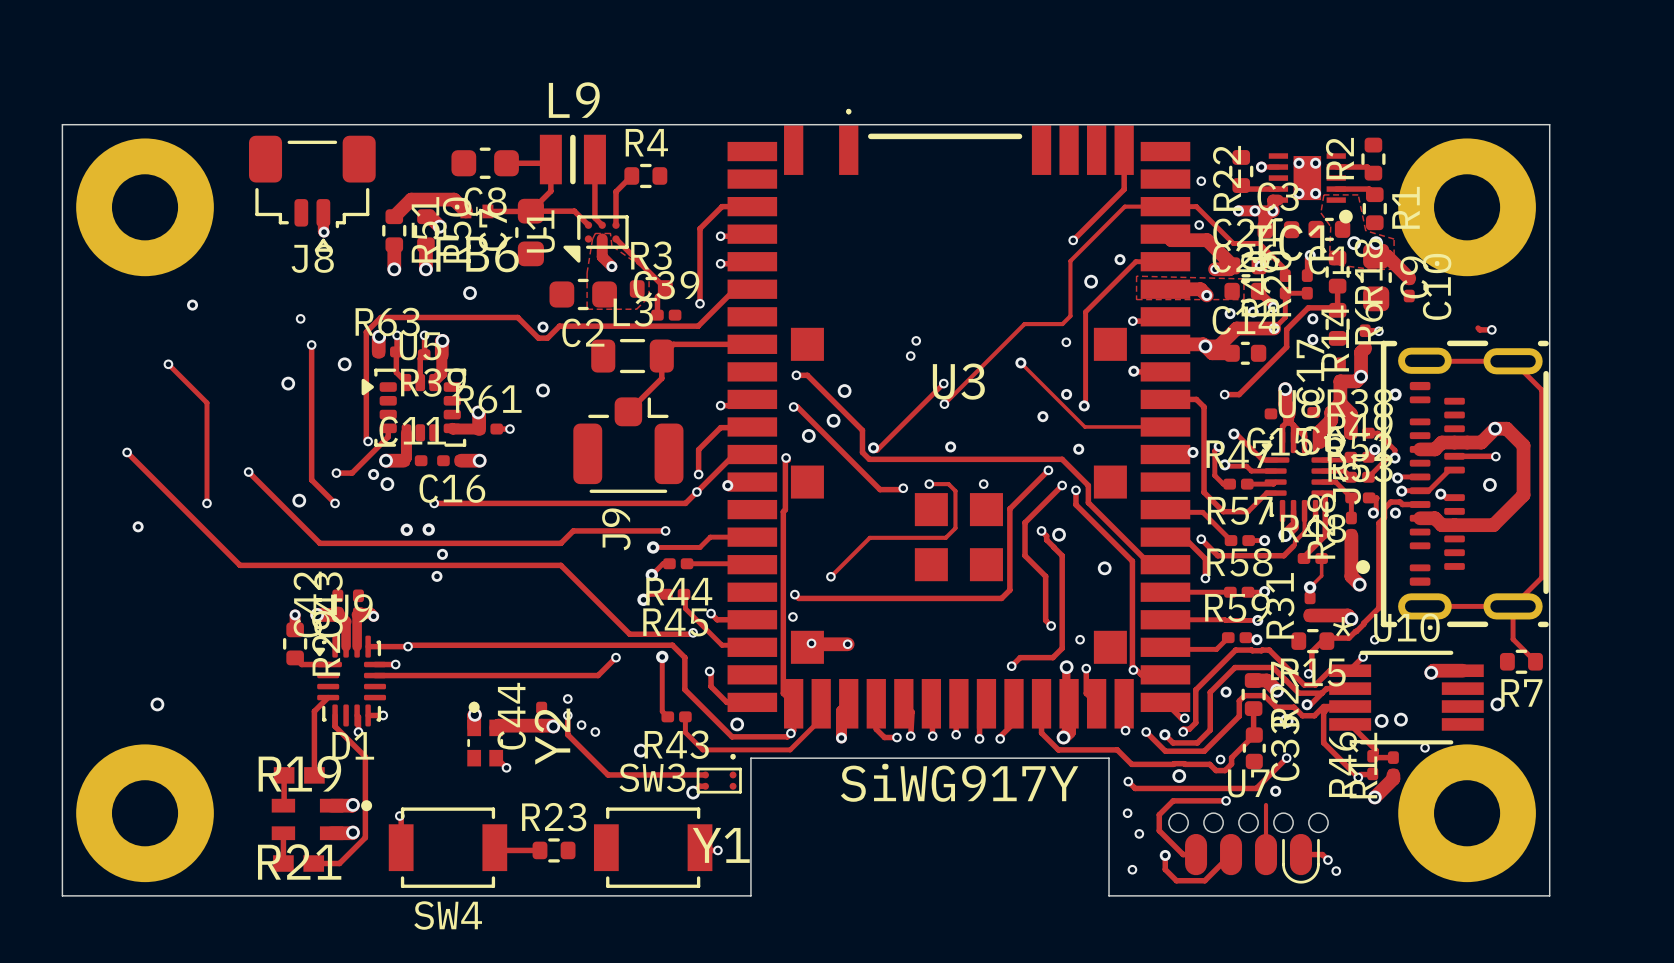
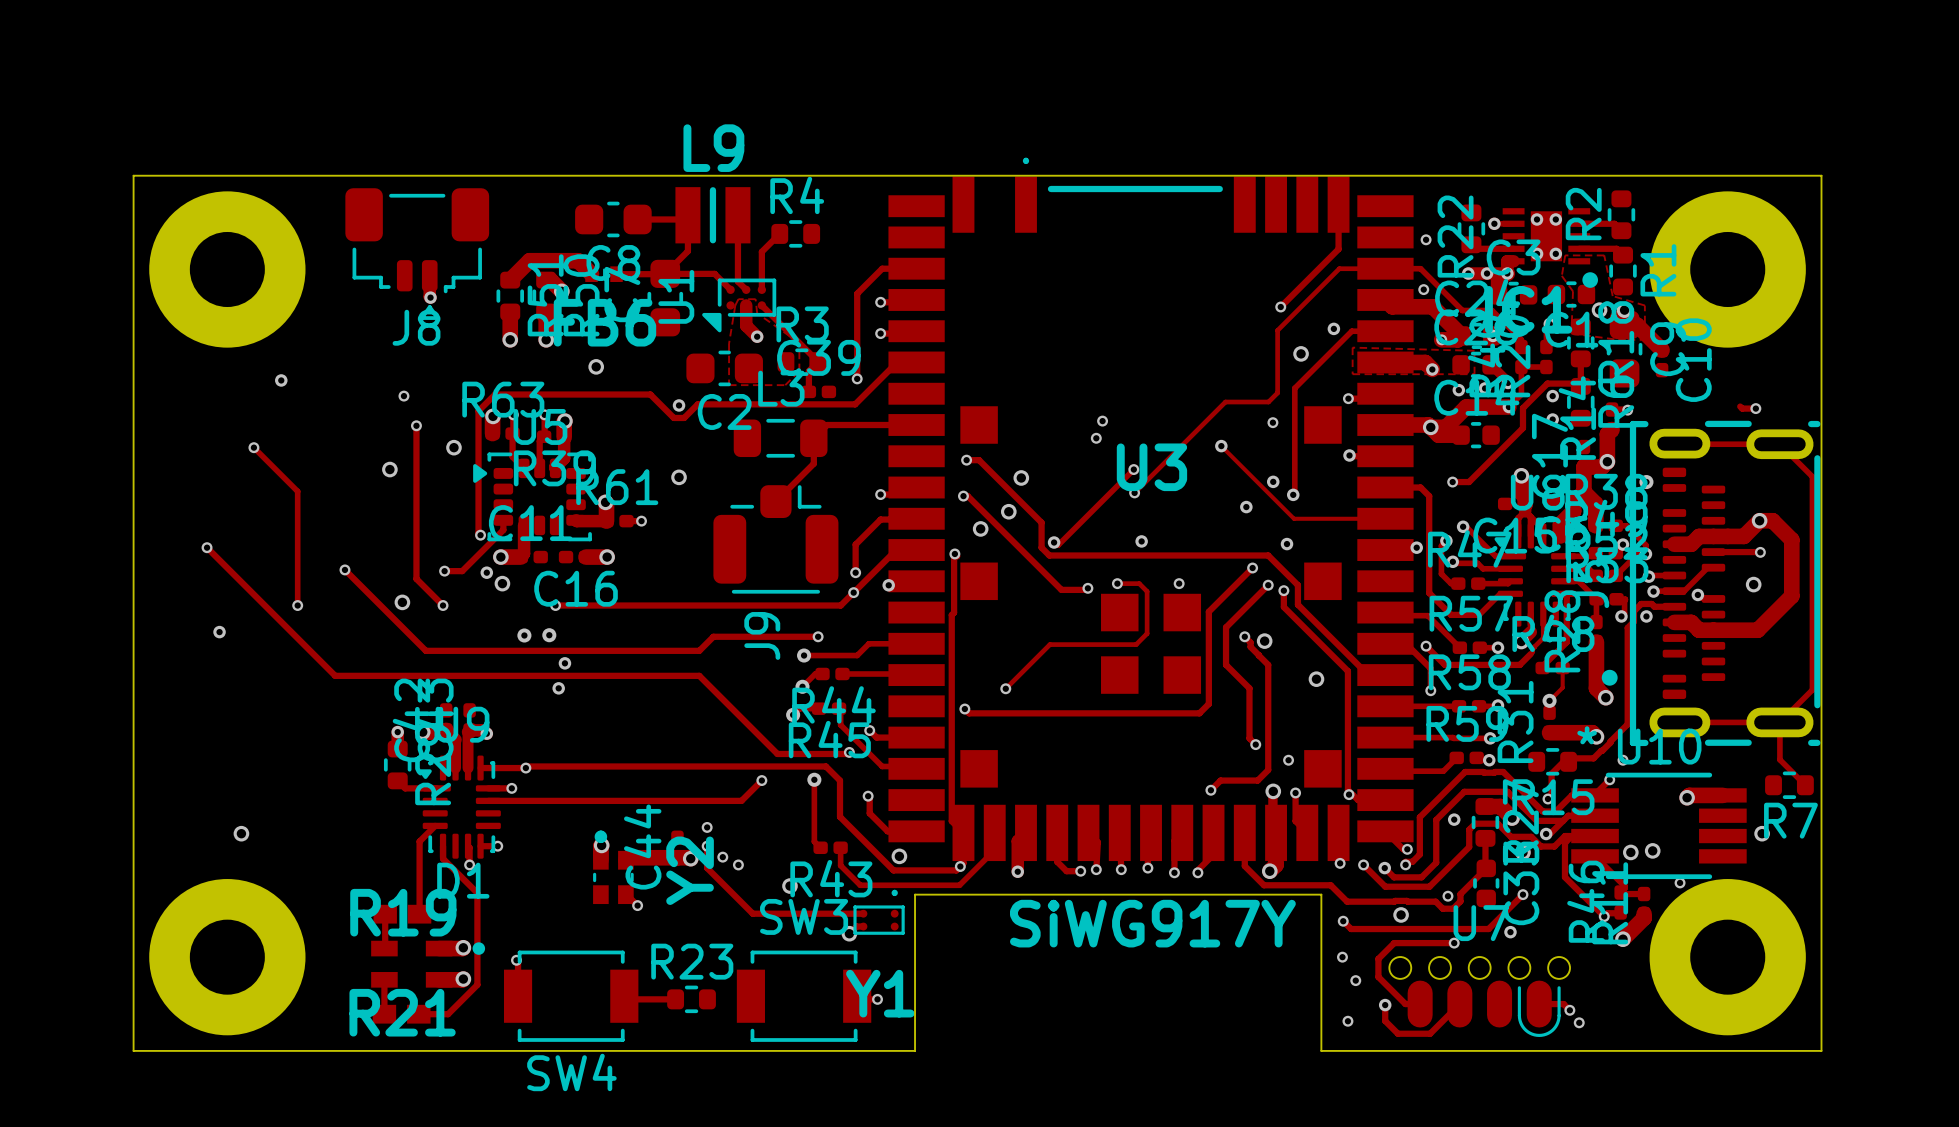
via: (792, 616) -> none
via: (811, 643) -> none
track: (847, 644) (810, 644) (807, 647) -> none
via: (847, 644) -> none
track: (1266, 804) (1266, 854) -> none

